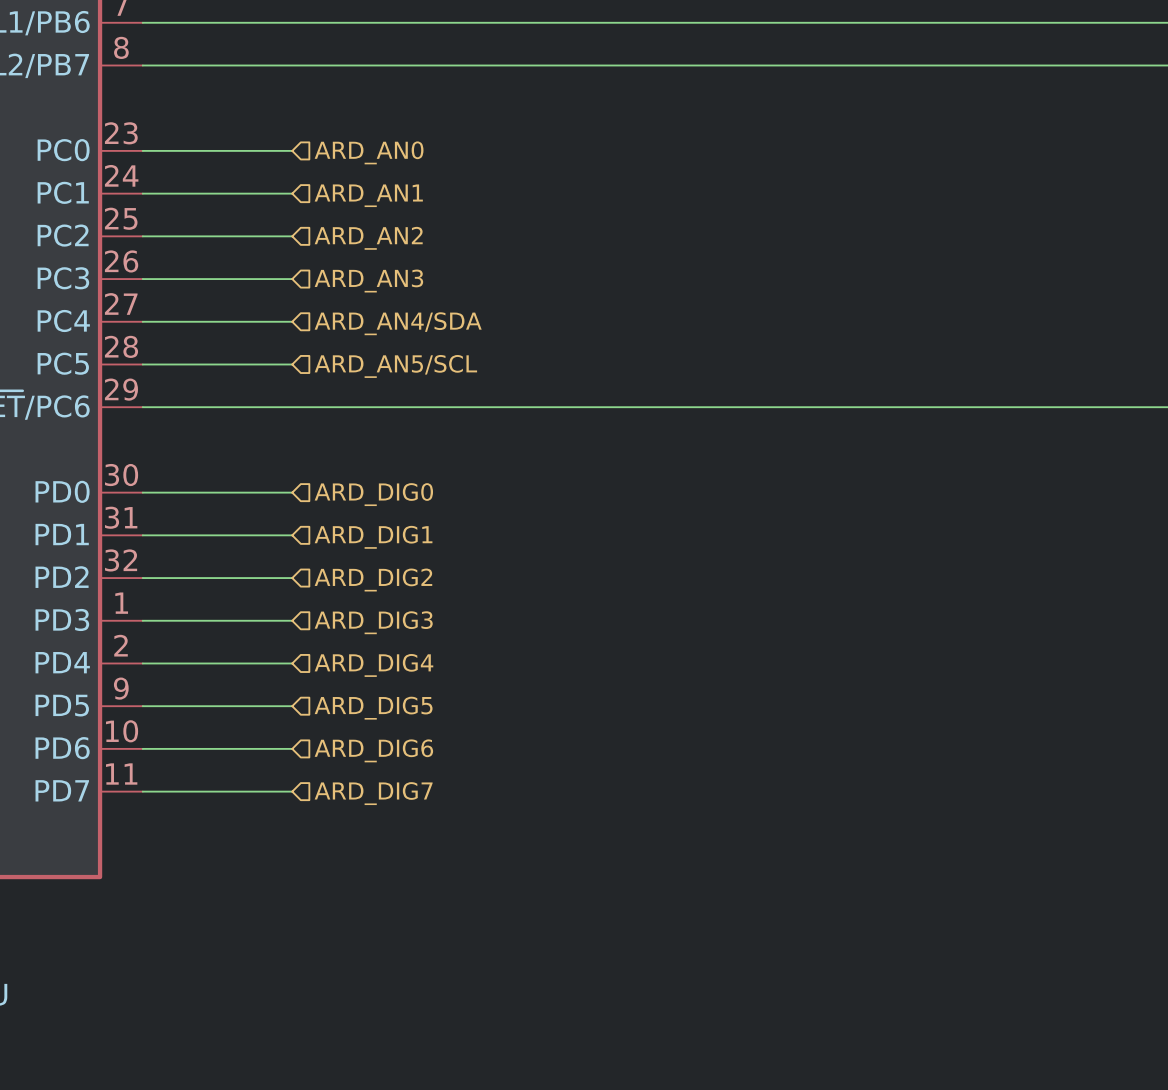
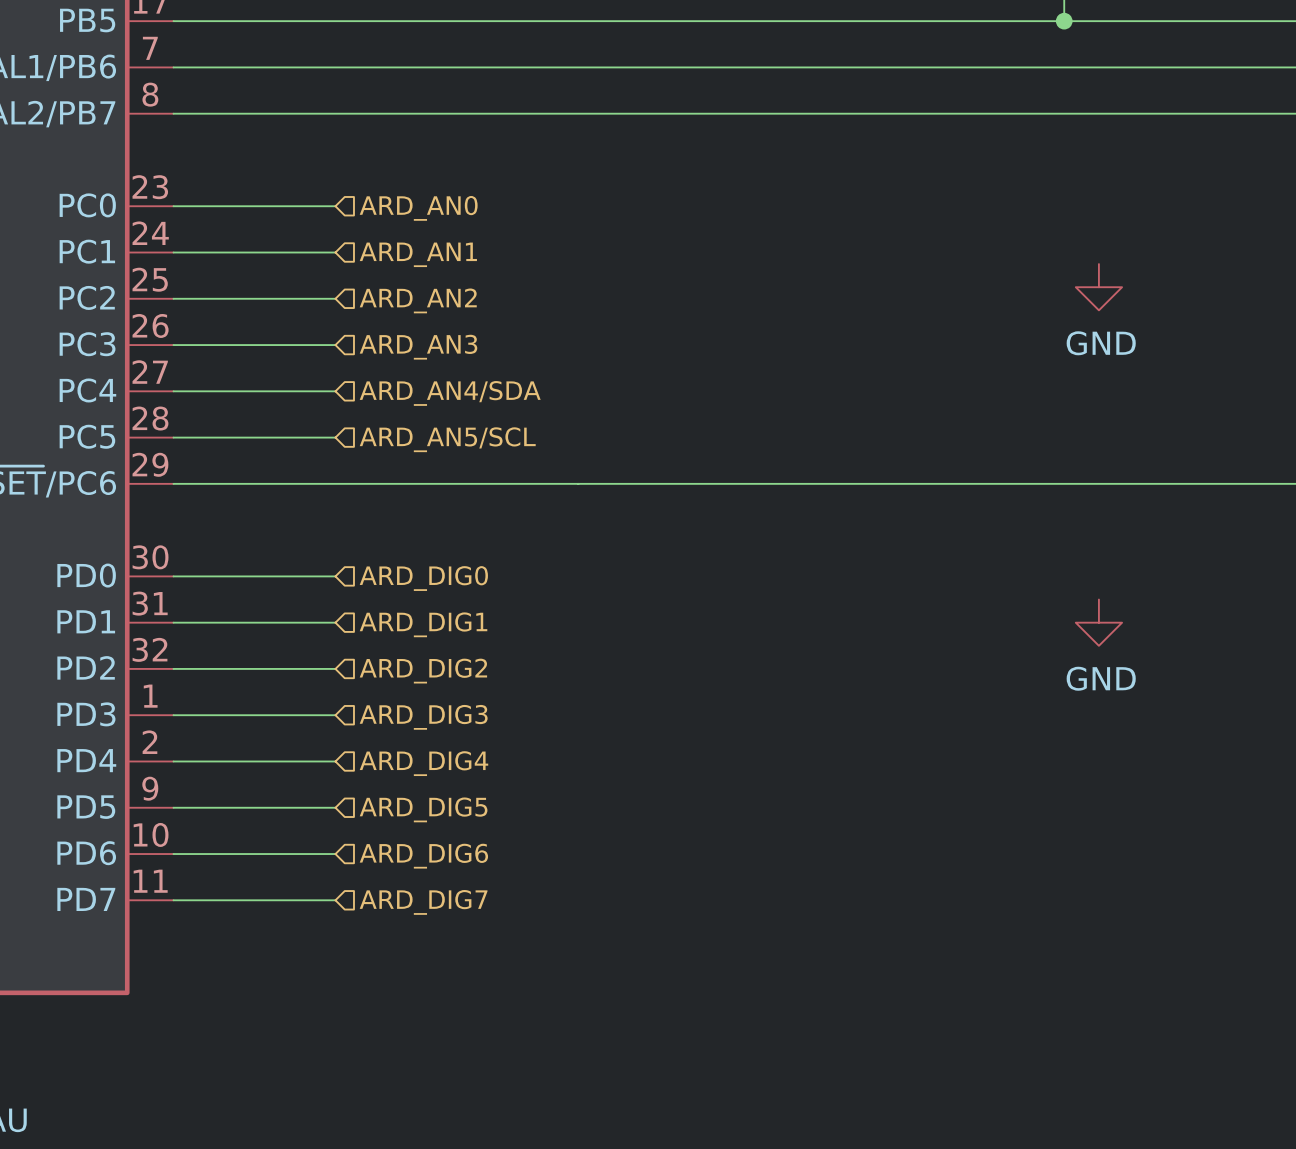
power symbol: none -> GND (1098, 287)
power symbol: none -> GND (1098, 622)

